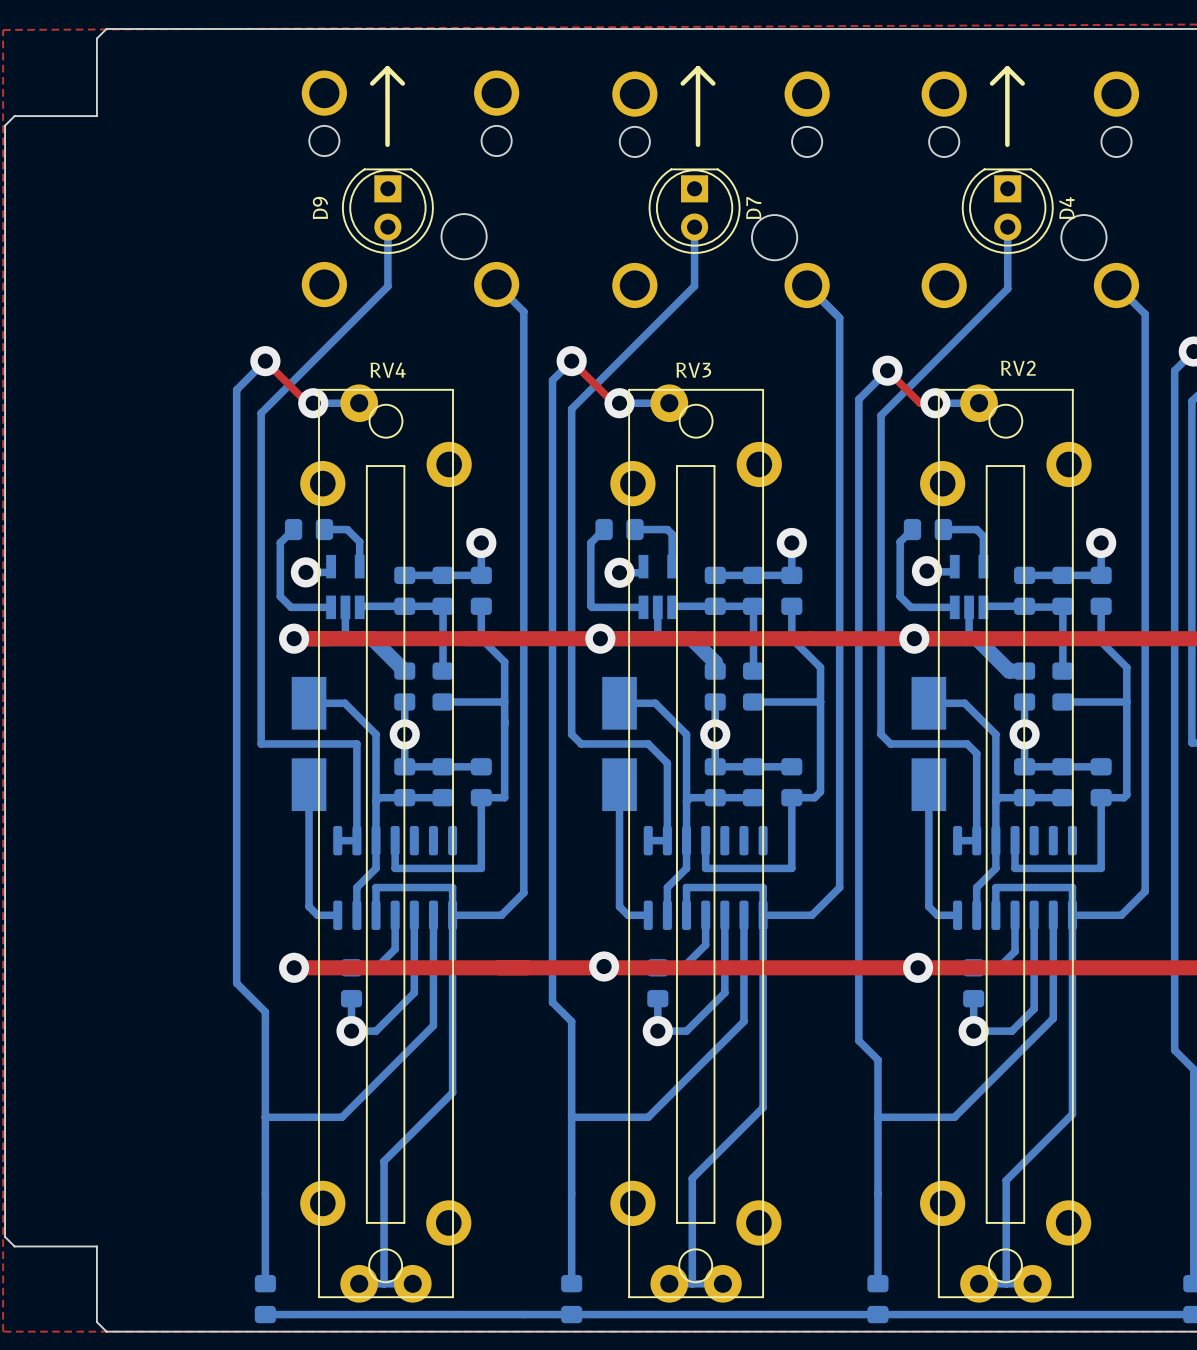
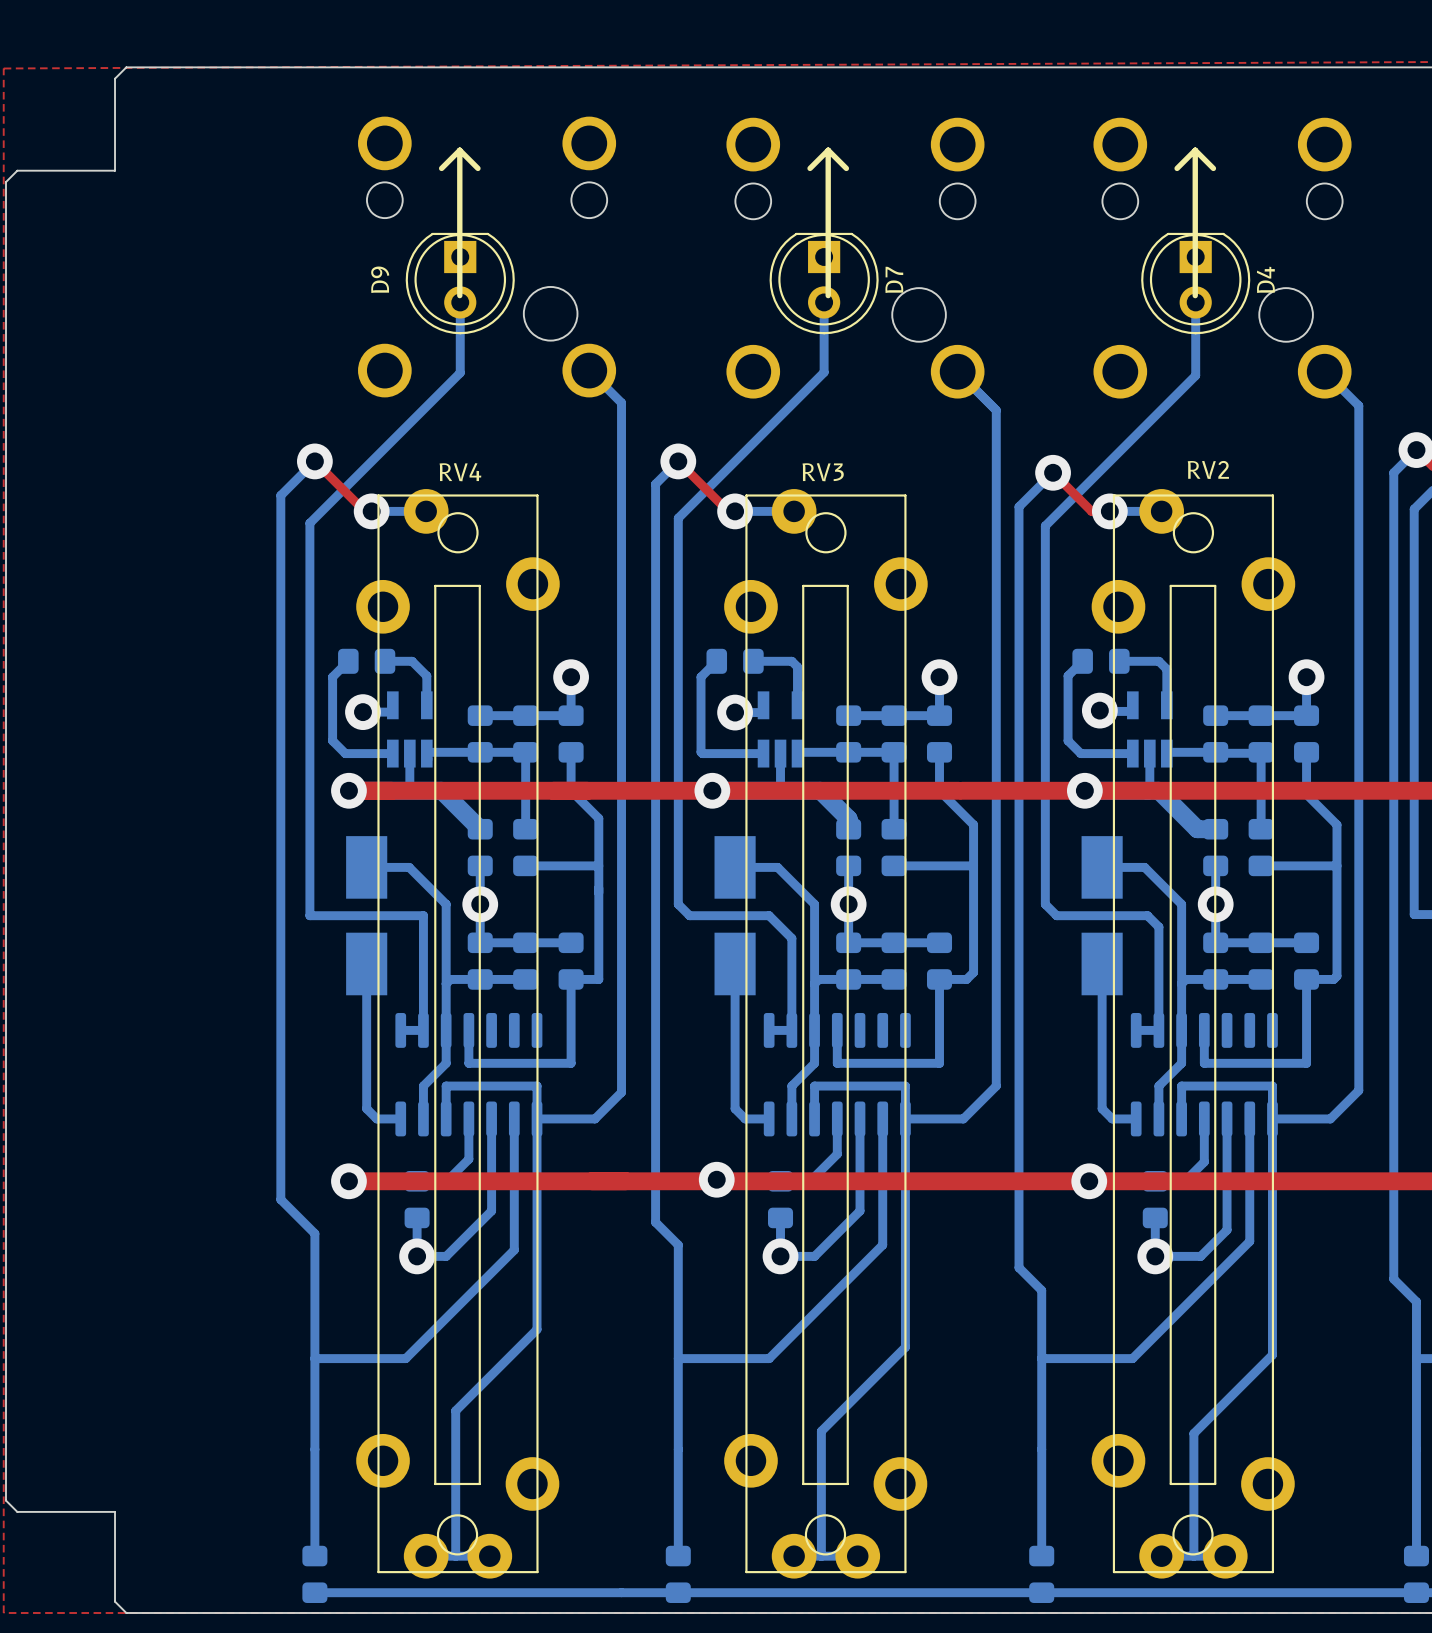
line: (387, 68) (402, 83) -> none
line: (387, 68) (387, 98) -> none
line: (387, 68) (372, 83) -> none
line: (698, 68) (713, 83) -> none
line: (698, 68) (698, 98) -> none
line: (698, 68) (682, 83) -> none
line: (1007, 68) (1022, 83) -> none
line: (1007, 68) (1007, 98) -> none
line: (1007, 68) (992, 83) -> none
line: none -> (441, 168) (459, 150) (477, 168)
line: none -> (810, 168) (828, 150) (846, 168)
line: none -> (1177, 168) (1195, 150) (1213, 168)
line: none -> (459, 204) (459, 295)
line: none -> (828, 204) (828, 295)
line: none -> (1195, 204) (1195, 295)

